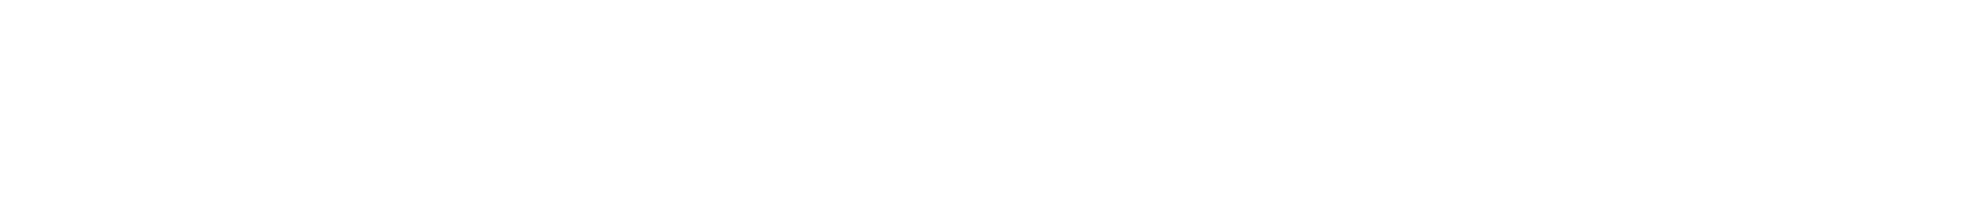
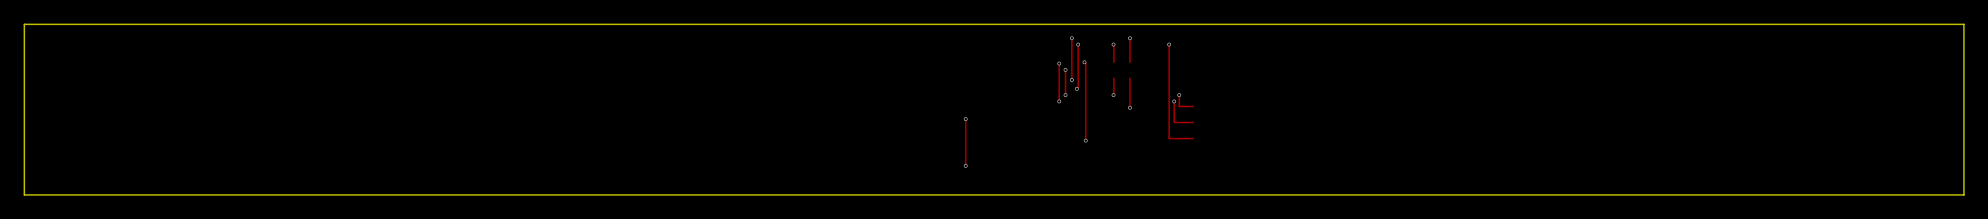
board edge: none -> (24, 24) (24, 194) (1963, 194) (1963, 24) (24, 24)
track: none -> (1071, 38) (1071, 79)
via: none -> (1071, 38)
track: none -> (1129, 38) (1129, 62)
via: none -> (1129, 38)
track: none -> (1078, 44) (1076, 88)
via: none -> (1078, 44)
track: none -> (1113, 44) (1113, 62)
via: none -> (1113, 44)
track: none -> (1169, 44) (1169, 138) (1193, 138)
via: none -> (1169, 44)
track: none -> (1084, 62) (1085, 140)
via: none -> (1084, 62)
track: none -> (1059, 63) (1059, 101)
via: none -> (1059, 63)
track: none -> (1065, 69) (1065, 95)
via: none -> (1065, 69)
track: none -> (1113, 78) (1113, 95)
track: none -> (1129, 78) (1129, 107)
via: none -> (1071, 79)
via: none -> (1076, 88)
via: none -> (1065, 95)
via: none -> (1113, 95)
track: none -> (1179, 95) (1179, 106) (1193, 106)
via: none -> (1179, 95)
via: none -> (1059, 101)
track: none -> (1174, 101) (1174, 121) (1193, 122)
via: none -> (1174, 101)
via: none -> (1129, 107)
track: none -> (965, 119) (965, 165)
via: none -> (965, 119)
via: none -> (1085, 140)
via: none -> (965, 165)

